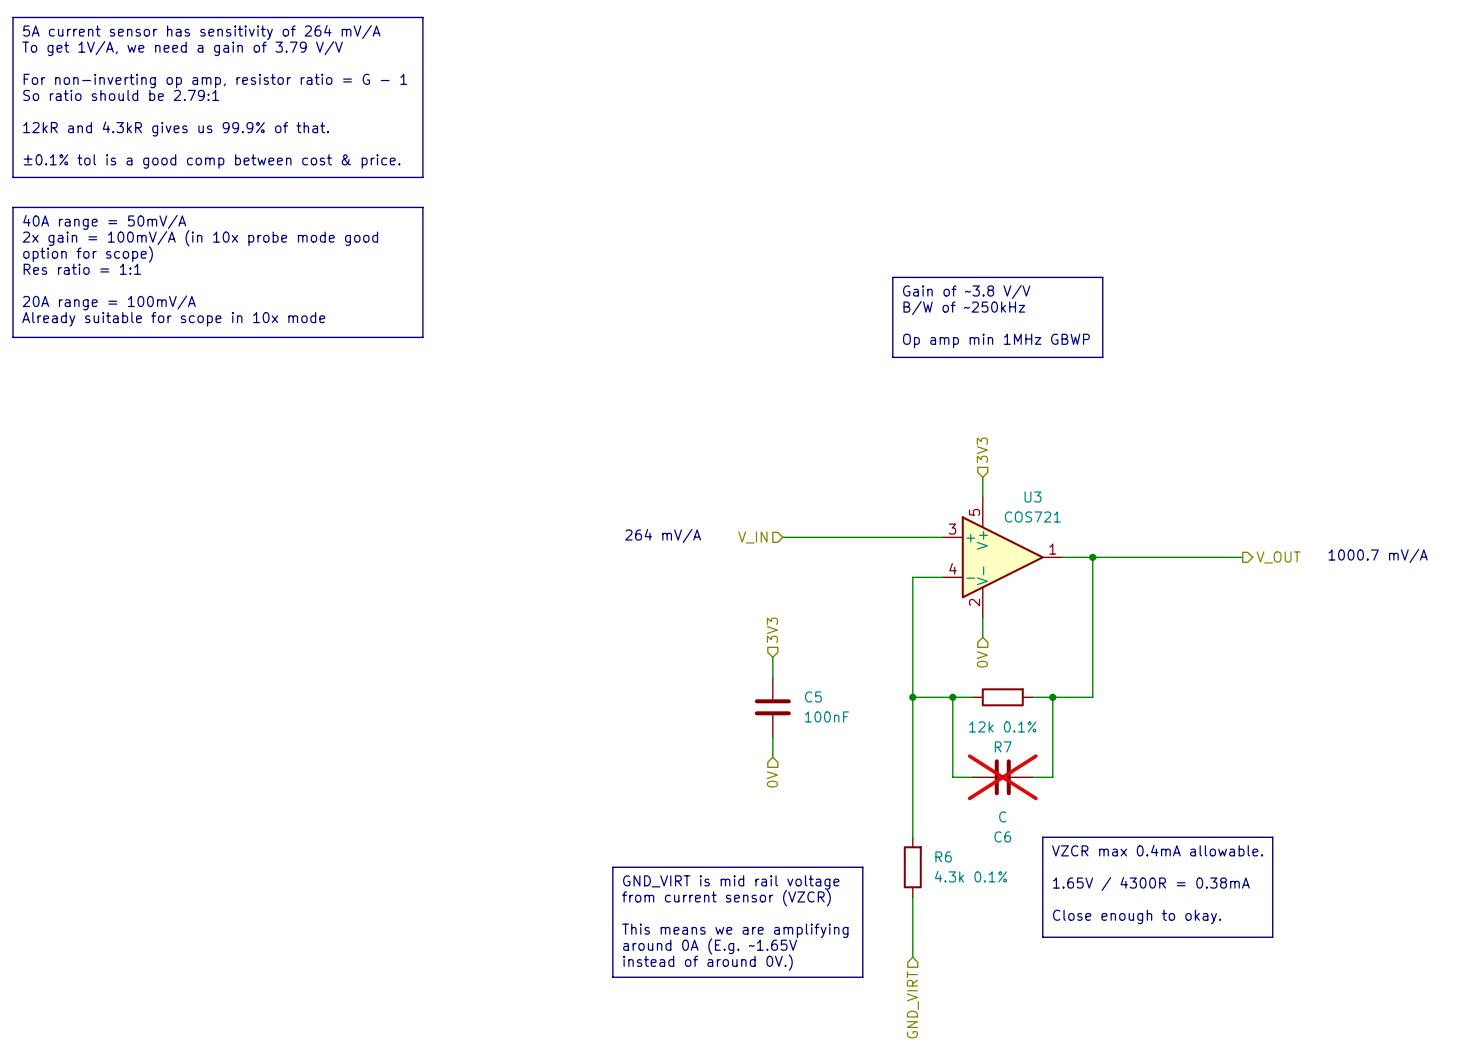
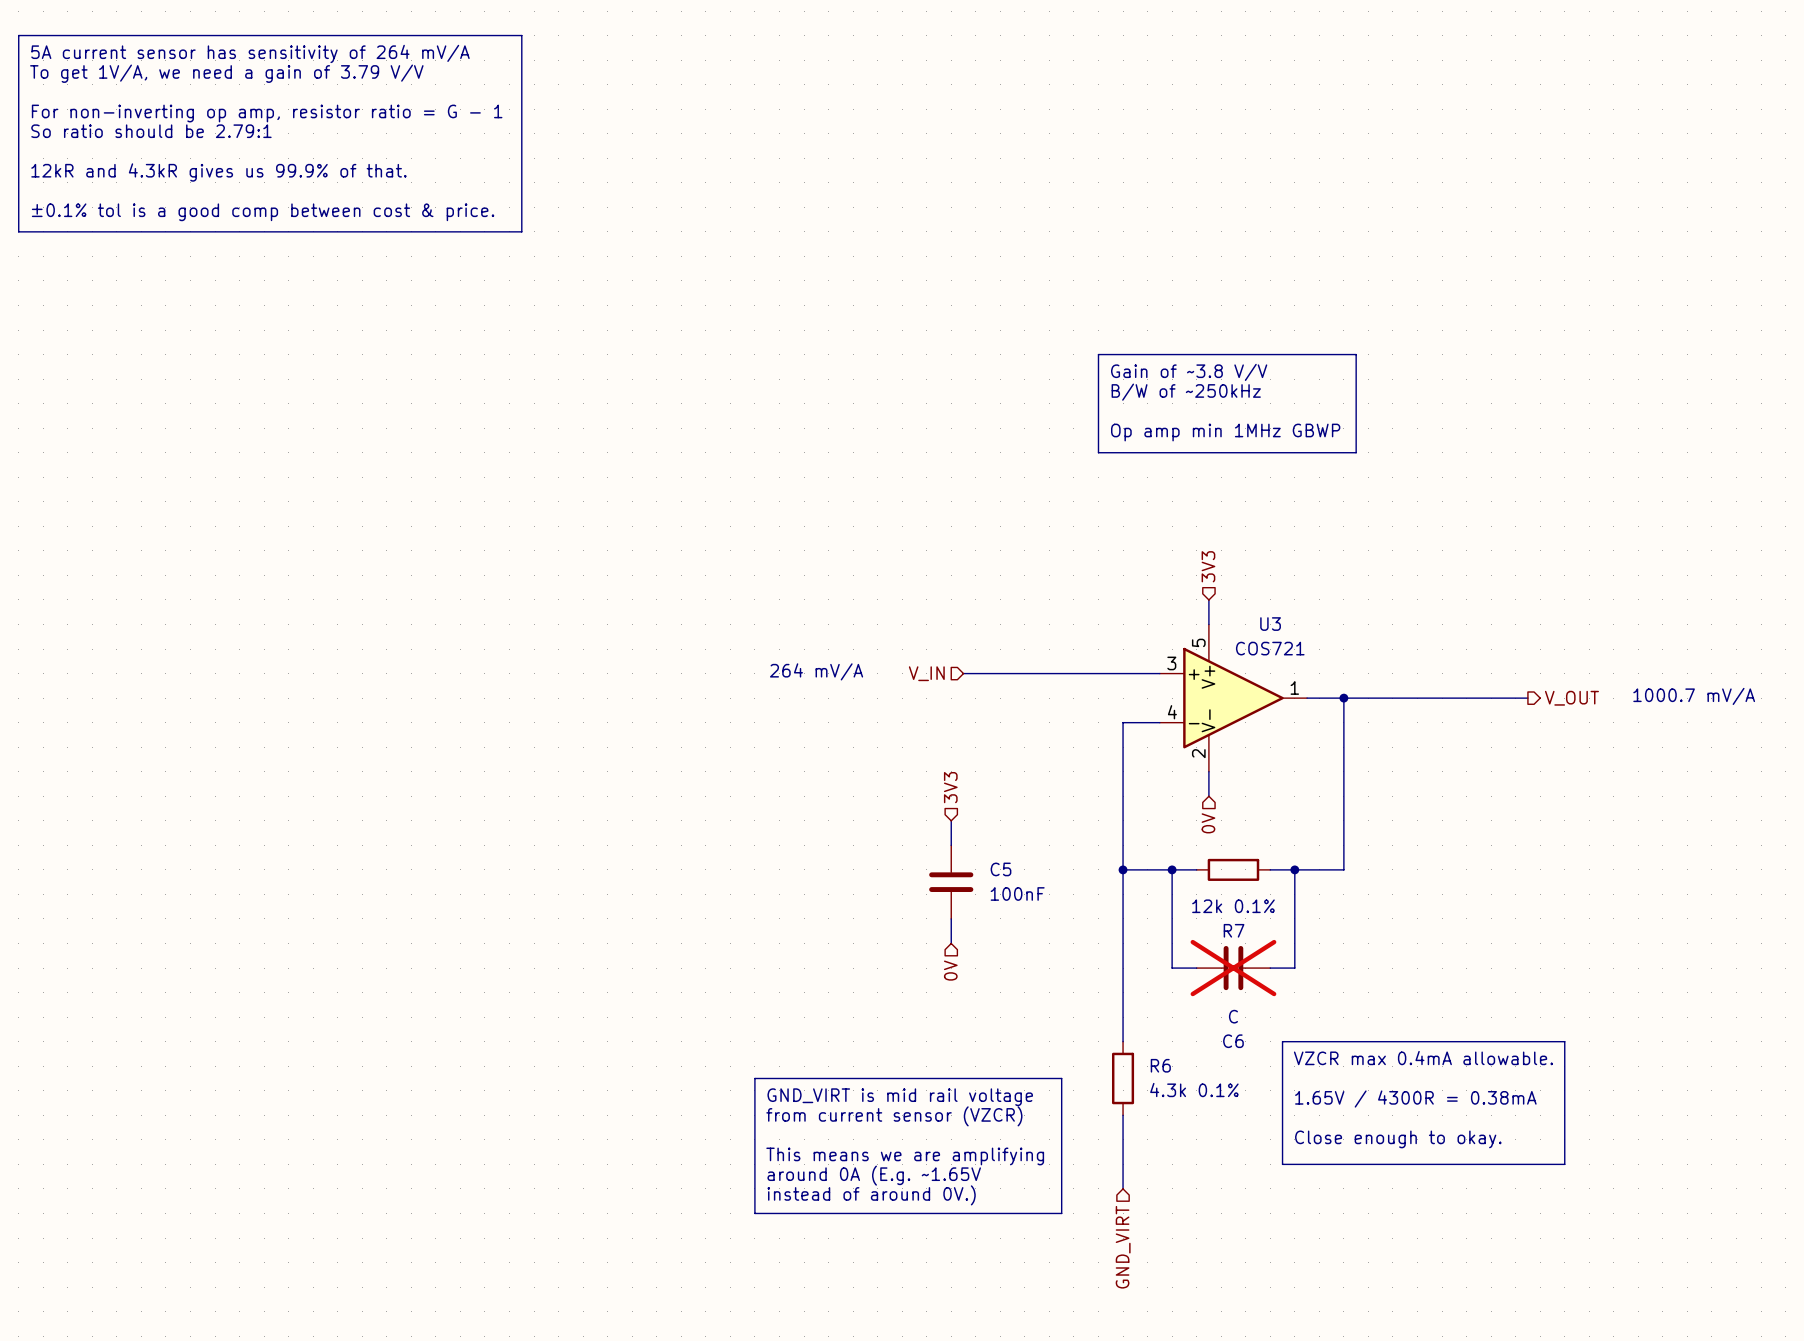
line: (12, 207) (422, 207) (422, 337) (12, 337) (12, 207) -> none
text: 40A range = 50mV/A (104, 222) -> none
text: 2x gain = 100mV/A (in 10x probe mode good (200, 238) -> none
text: option for scope) (88, 254) -> none
text: Res ratio = 1:1 (82, 269) -> none
text: 20A range = 100mV/A (109, 302) -> none
text: Already suitable for scope in 10x mode (173, 319) -> none

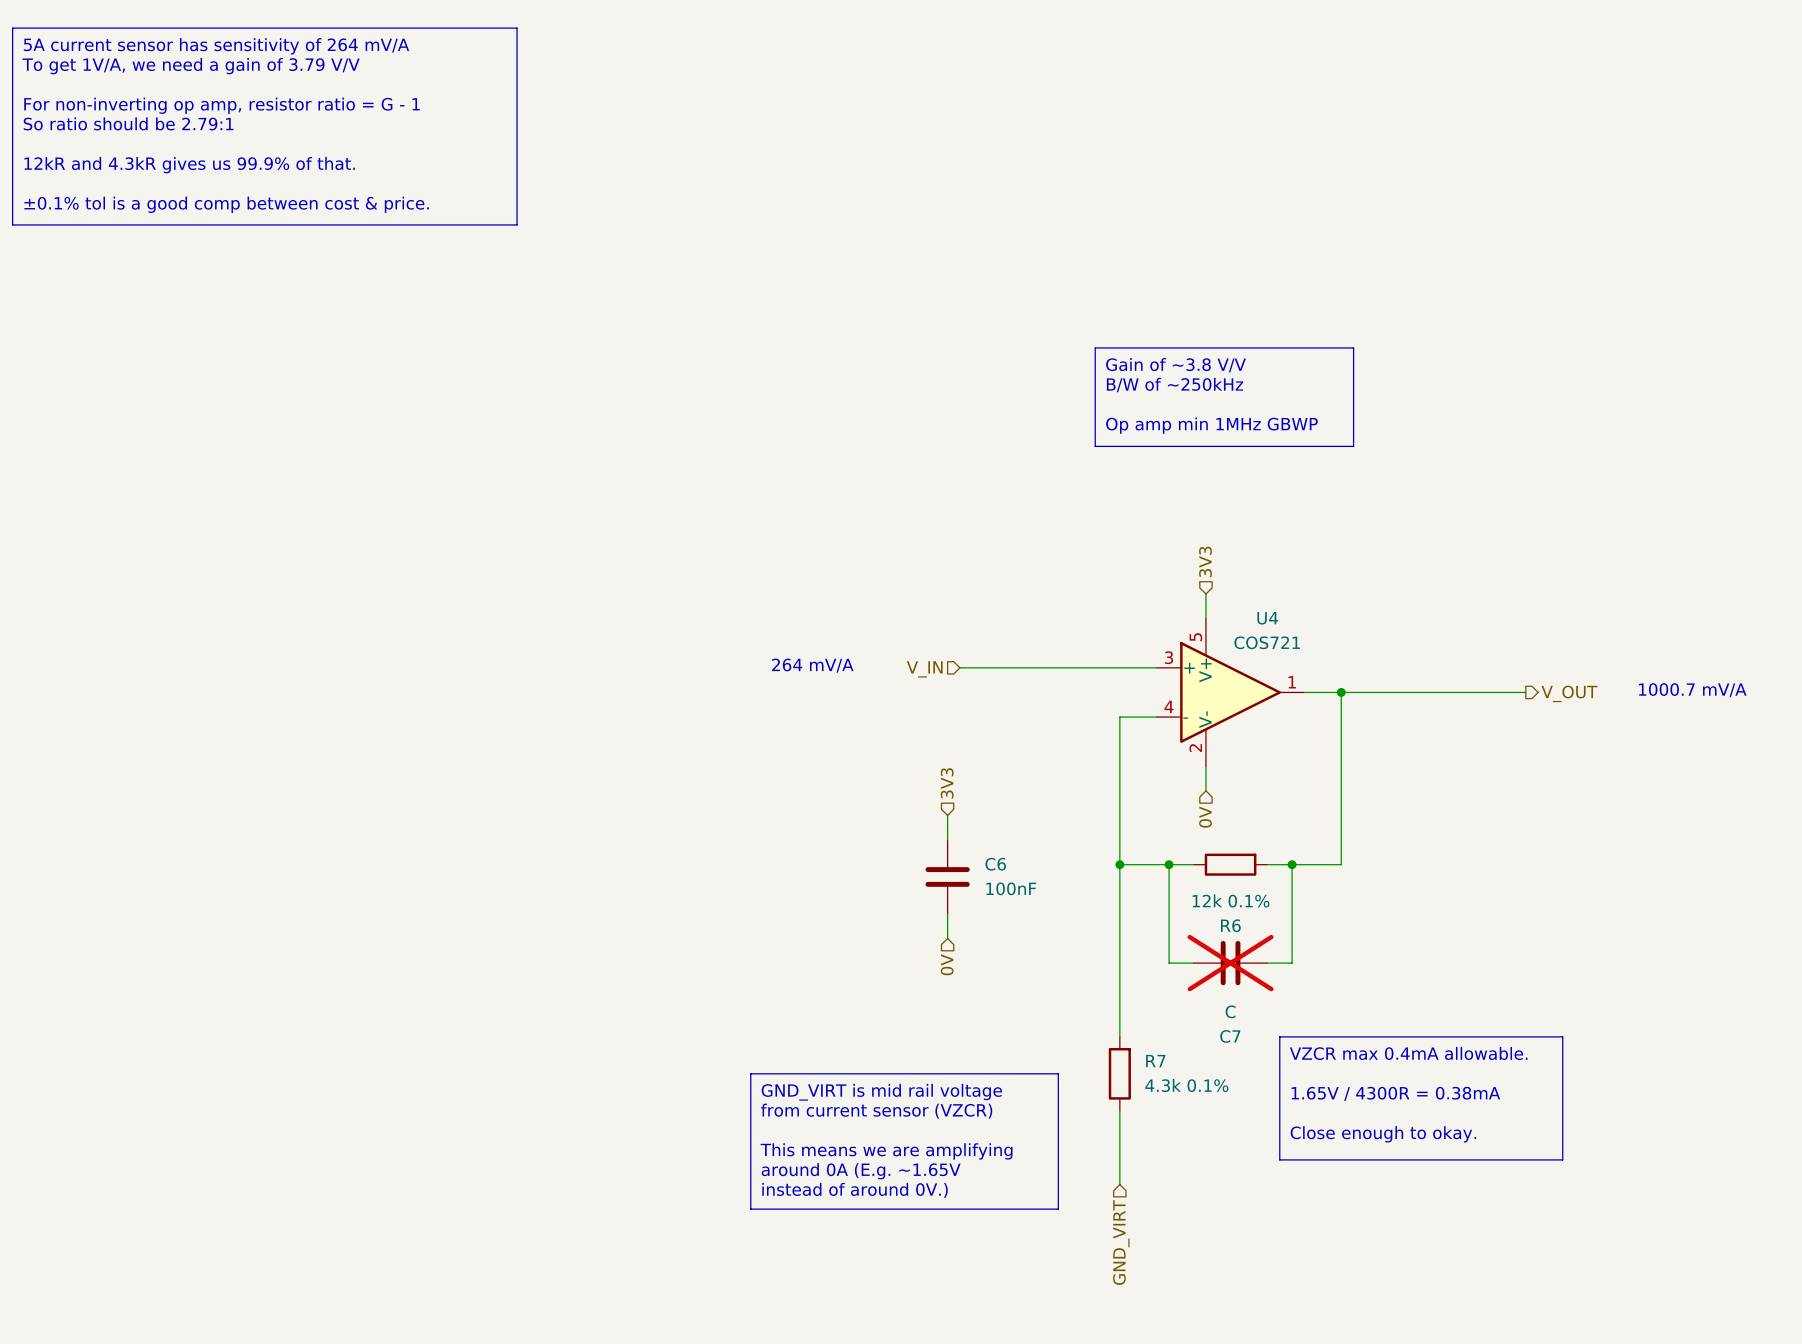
U3 name: U3 (1270, 624) -> U4 (1267, 618)
C5 name: C5 (1001, 869) -> C6 (995, 864)
R7 name: R7 (1234, 930) -> R6 (1230, 925)
C6 name: C6 (1233, 1041) -> C7 (1230, 1036)
R6 name: R6 (1160, 1065) -> R7 (1155, 1061)

